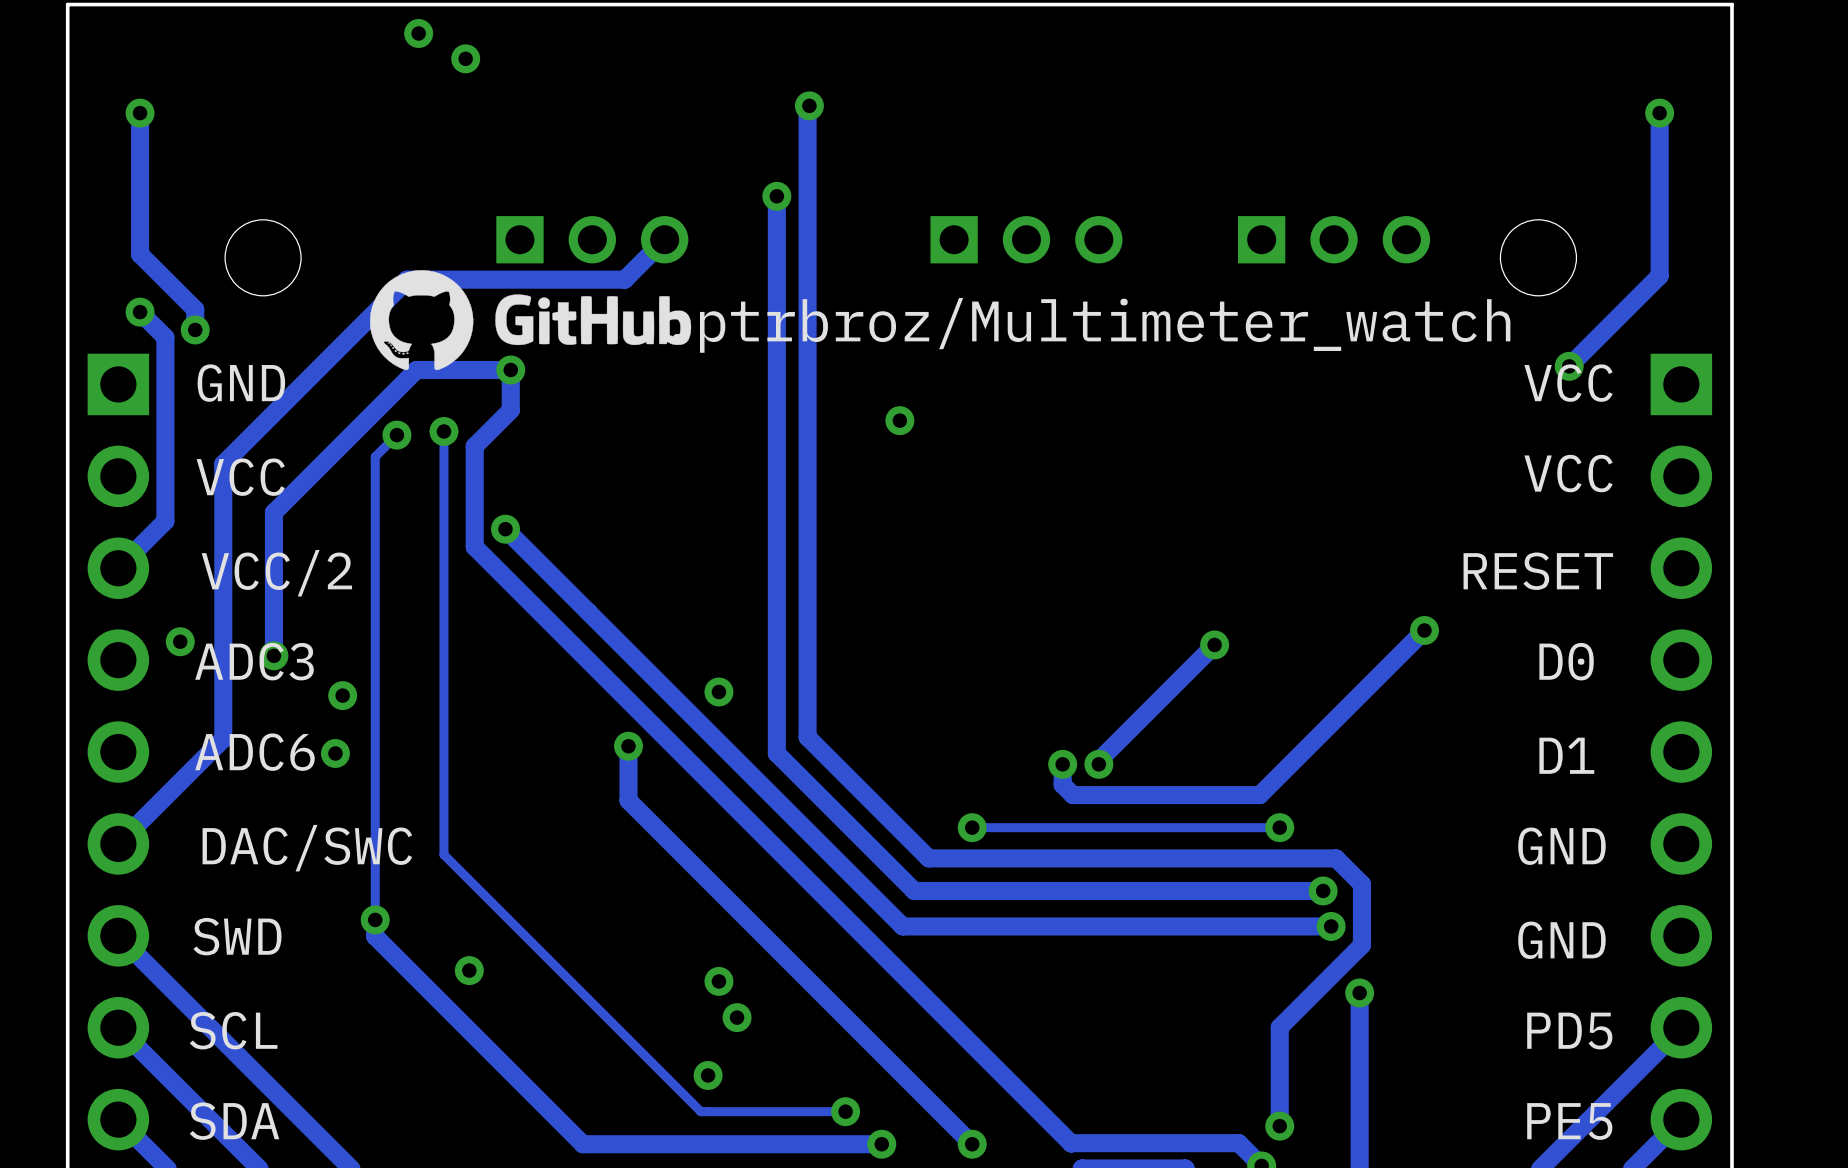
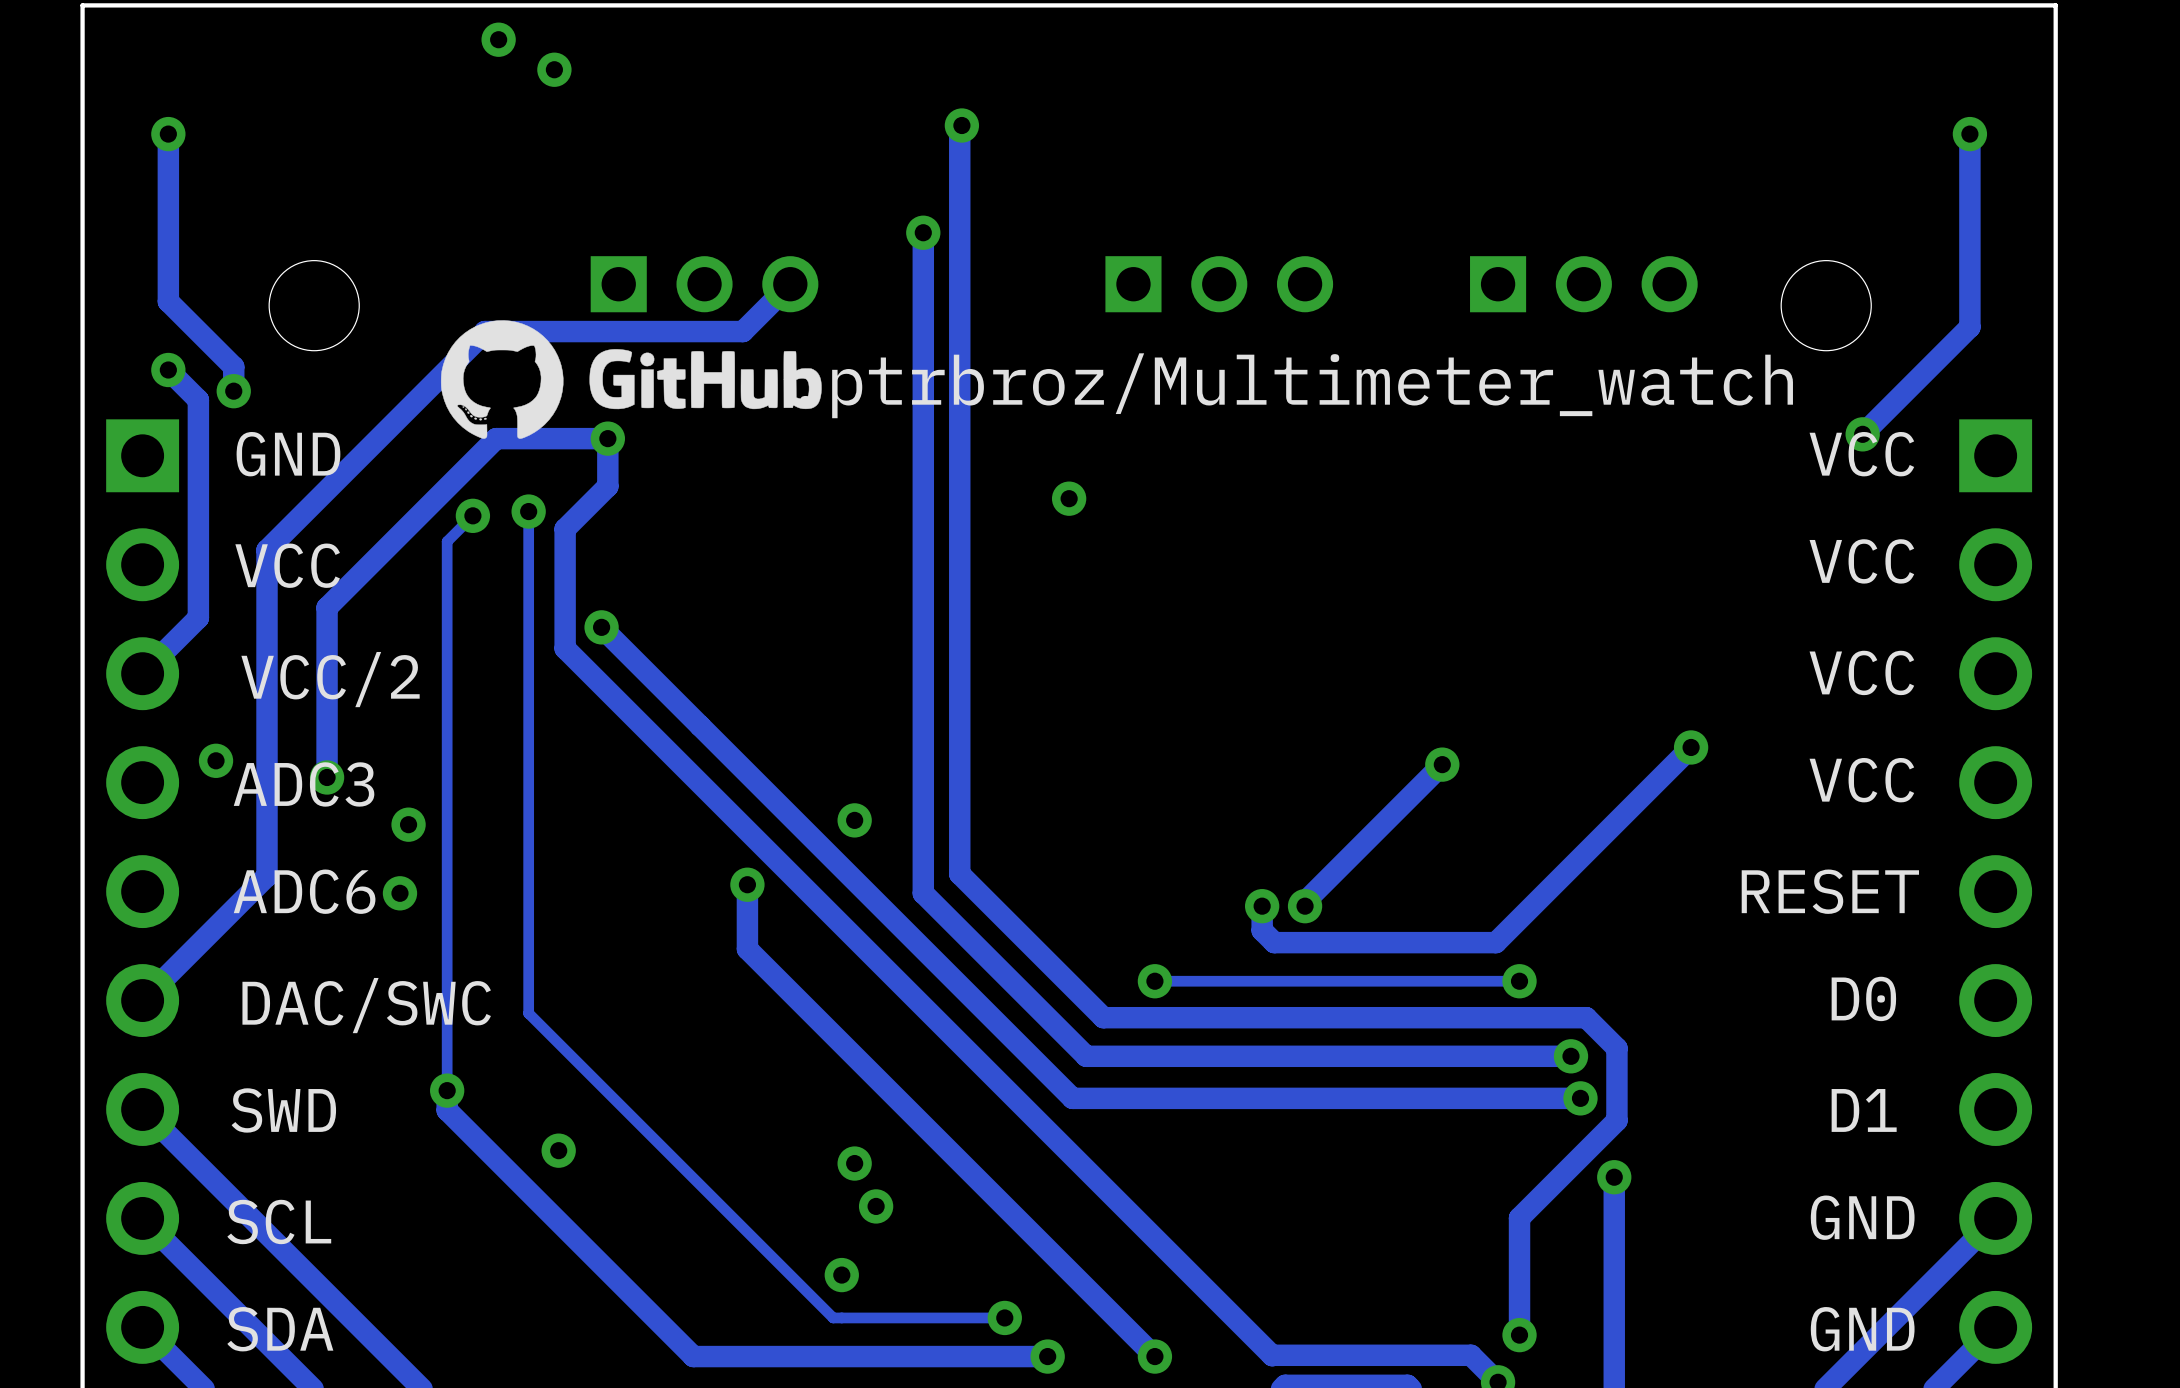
text: RESET (1538, 571) -> VCC (1861, 672)
text: D0 (1566, 661) -> VCC (1861, 780)
text: D1 (1566, 755) -> RESET (1830, 891)
text: GND (1561, 846) -> D0 (1863, 998)
text: GND (1561, 940) -> D1 (1864, 1110)
text: PD5 (1569, 1031) -> GND (1862, 1217)
text: PE5 (1569, 1121) -> GND (1862, 1329)

